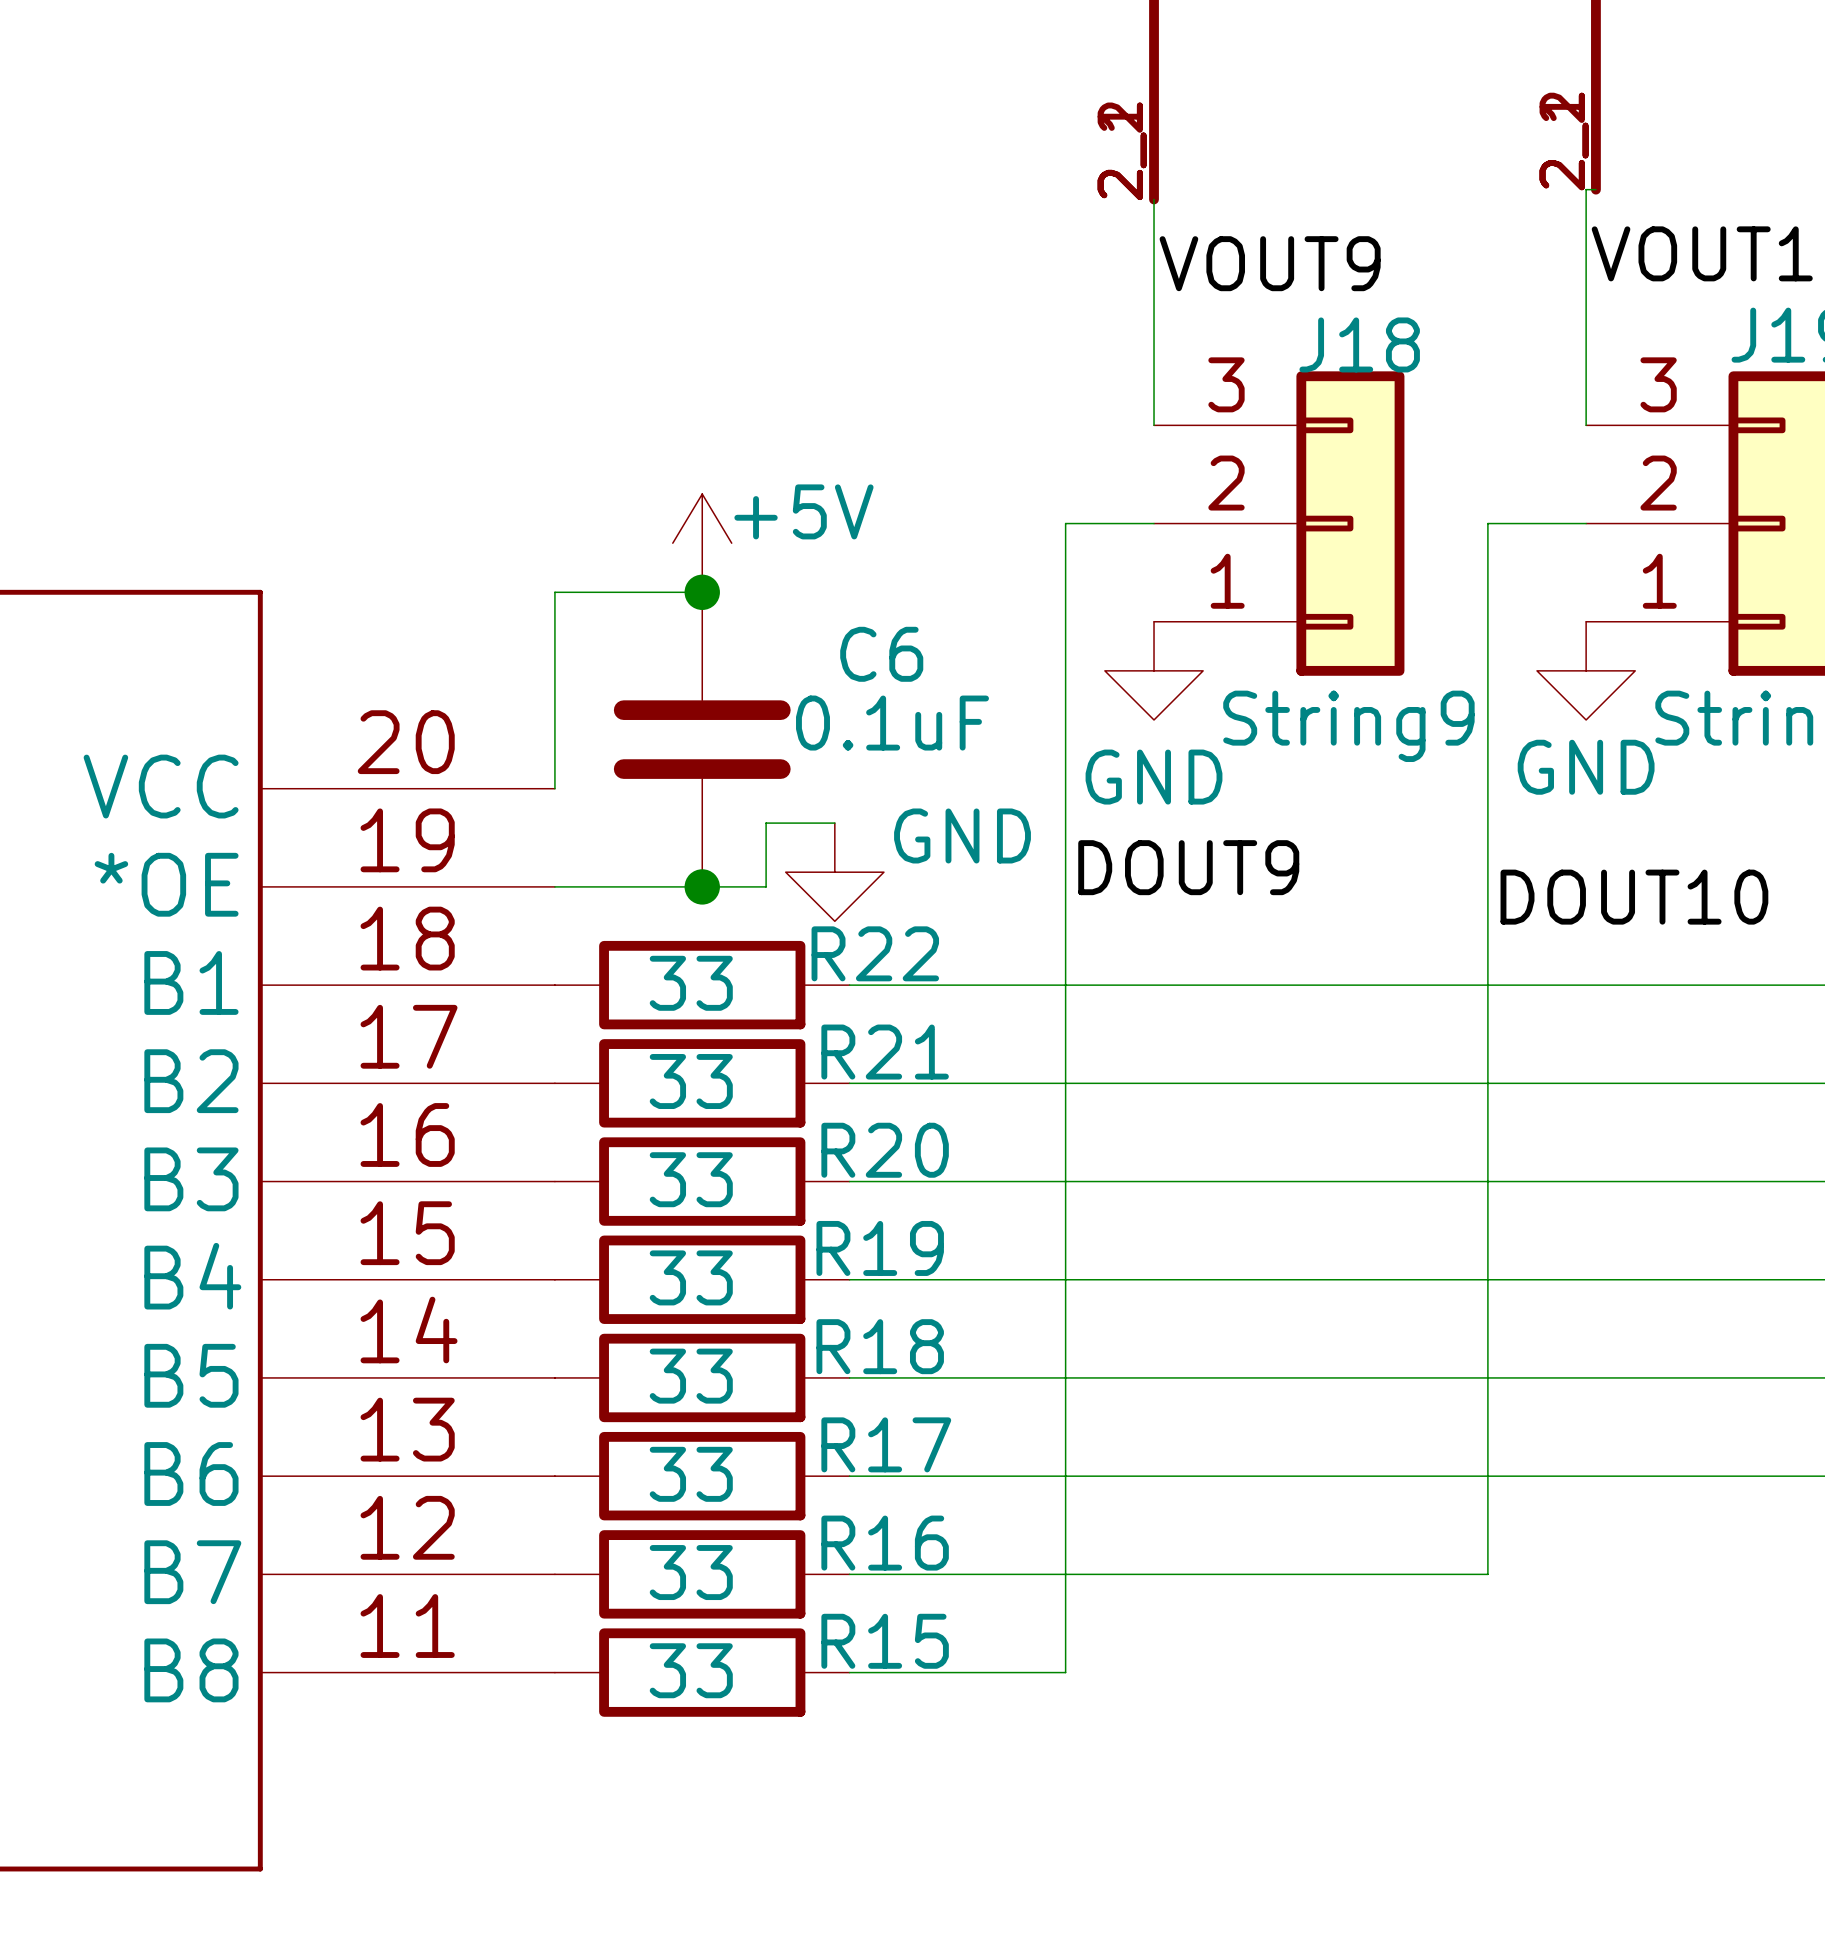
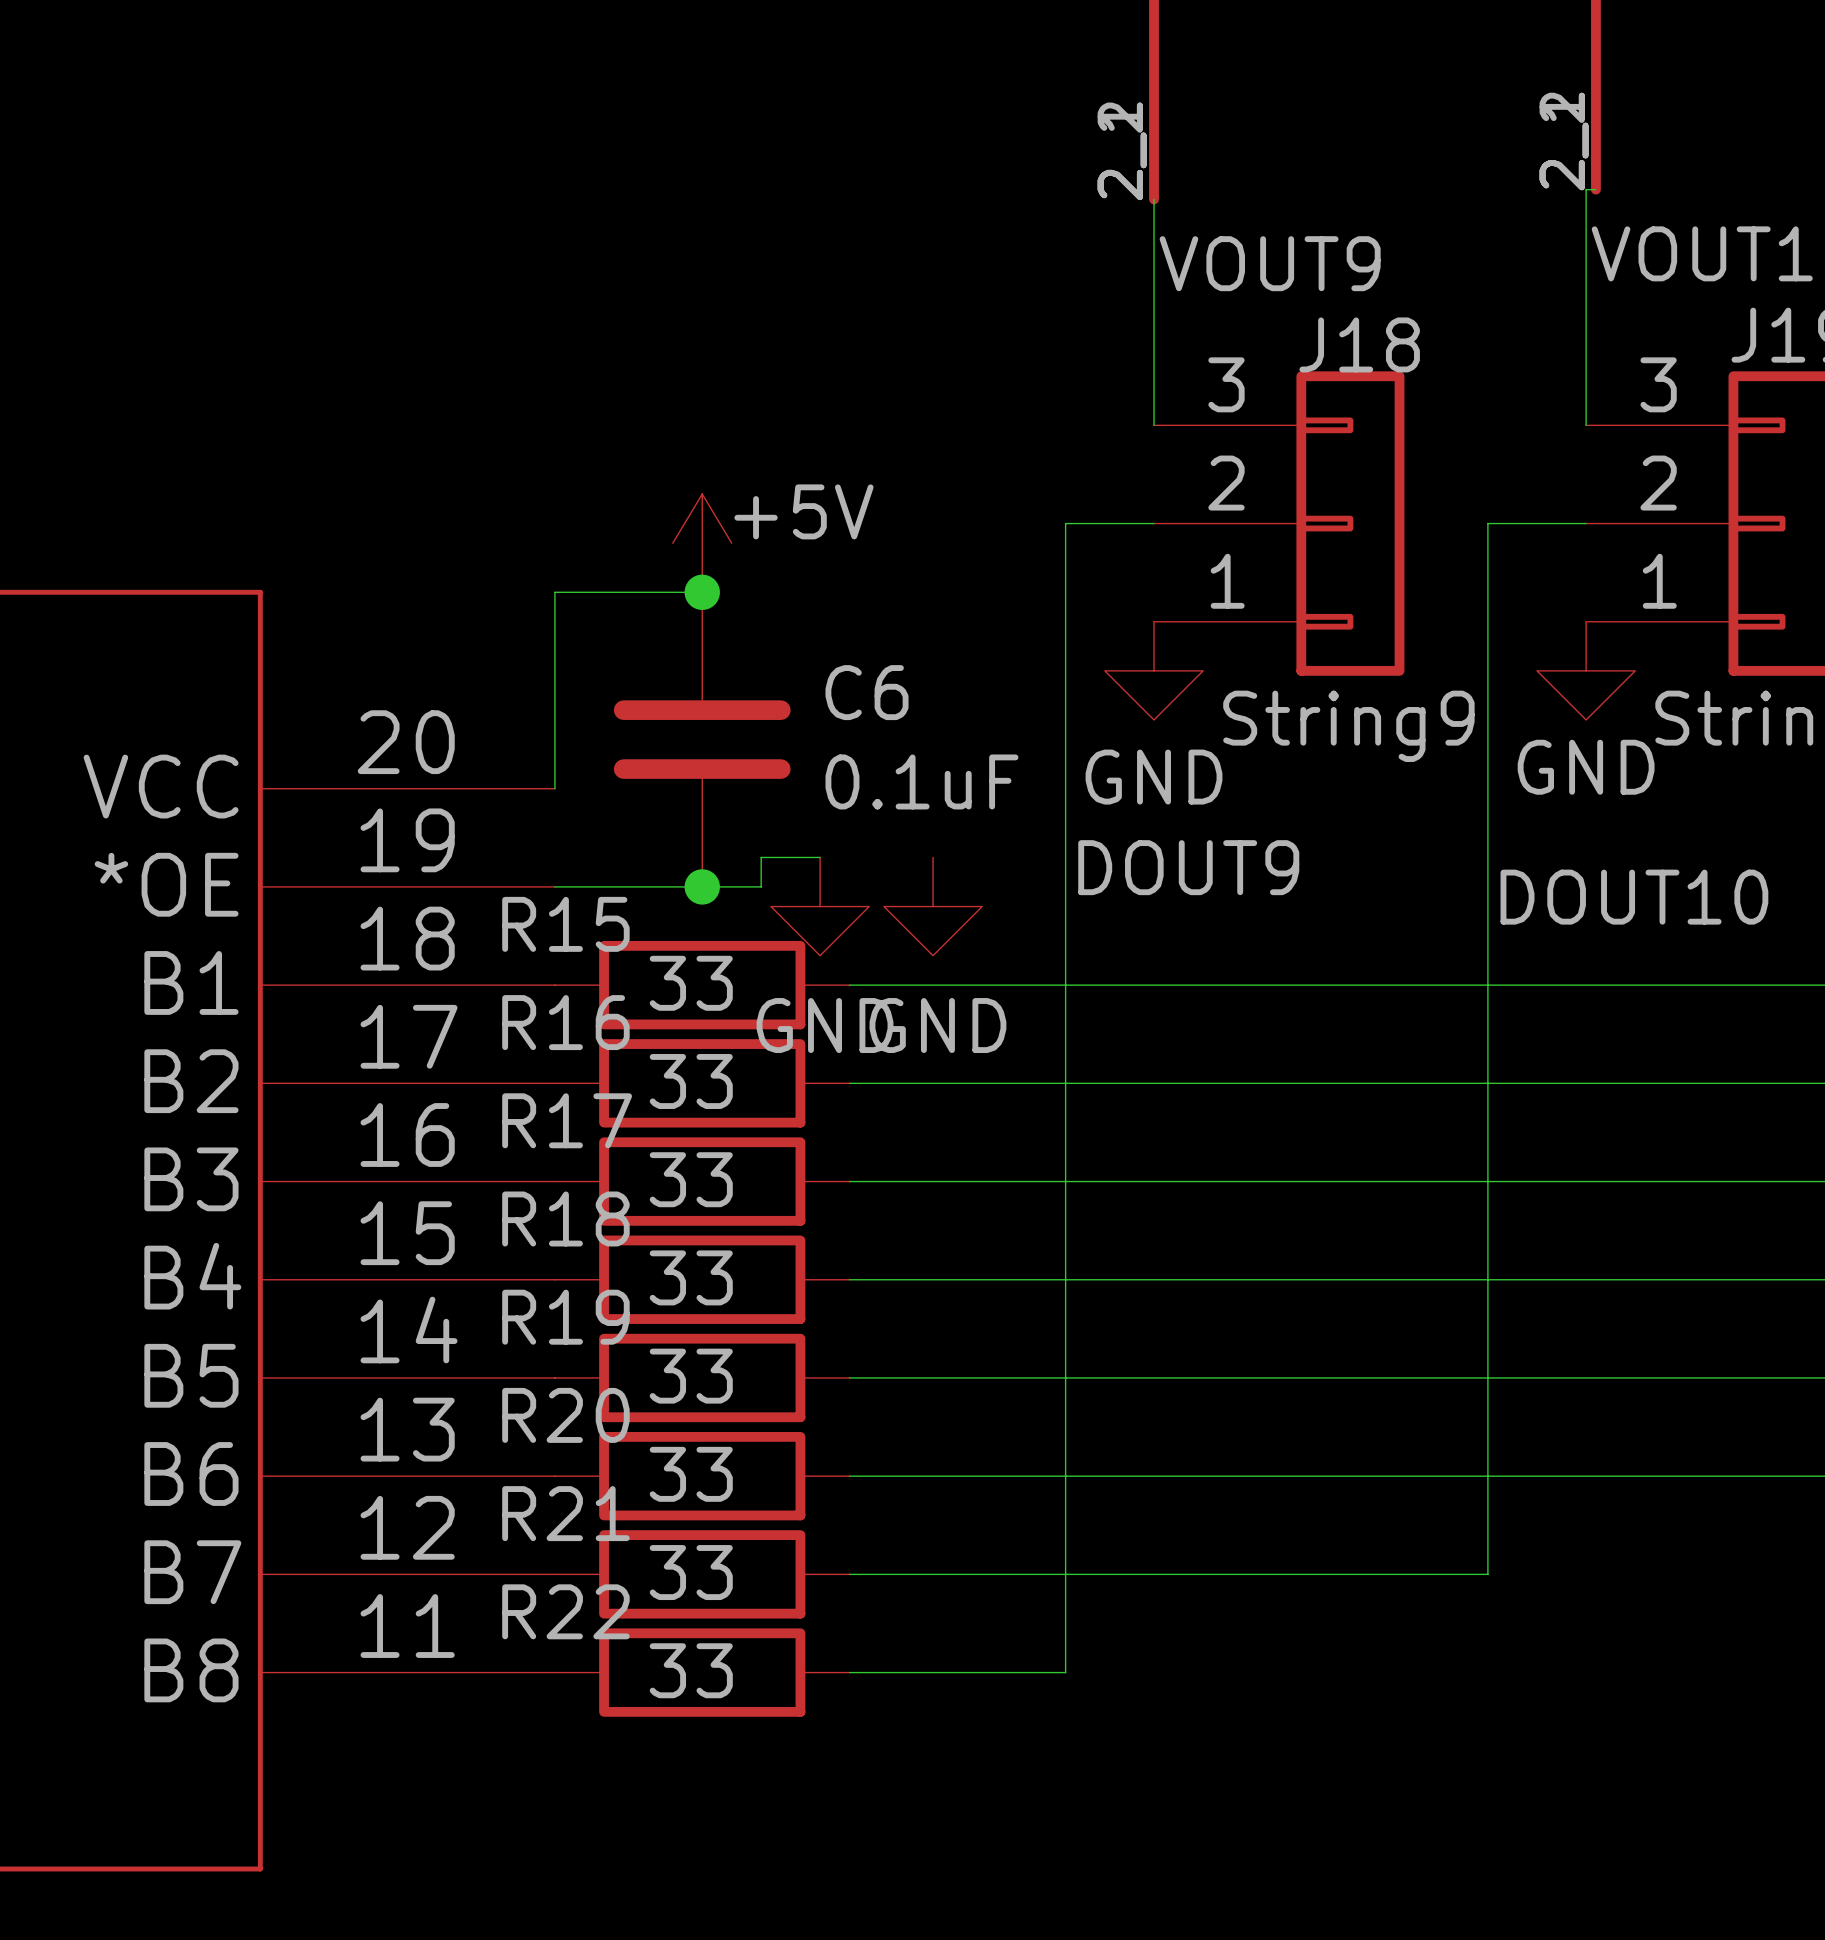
C6 name position: C6 (881, 654) -> C6 (867, 692)
C6 value position: 0.1uF (892, 723) -> 0.1uF (921, 781)
wire: (834, 823) (766, 823) (766, 886) (761, 886) -> (820, 857) (761, 857) (761, 886)
power symbol text position: GND (962, 835) -> GND (825, 1025)
power symbol position: GND (834, 872) -> GND (820, 906)
power symbol: none -> GND (933, 906)
R22 name: R22 (875, 953) -> R15 (565, 924)
R21 name: R21 (885, 1052) -> R16 (565, 1022)
R20 name: R20 (885, 1150) -> R17 (567, 1120)
R19 name: R19 (880, 1248) -> R18 (565, 1218)
R18 name: R18 (880, 1346) -> R19 (565, 1317)
R17 name: R17 (886, 1444) -> R20 (565, 1415)
R16 name: R16 (885, 1543) -> R21 (565, 1513)
R15 name: R15 (885, 1641) -> R22 (565, 1611)

